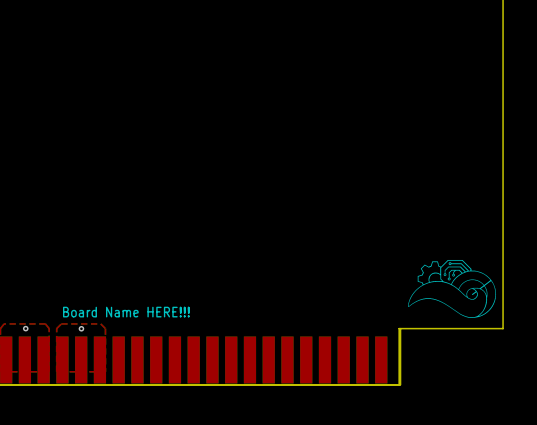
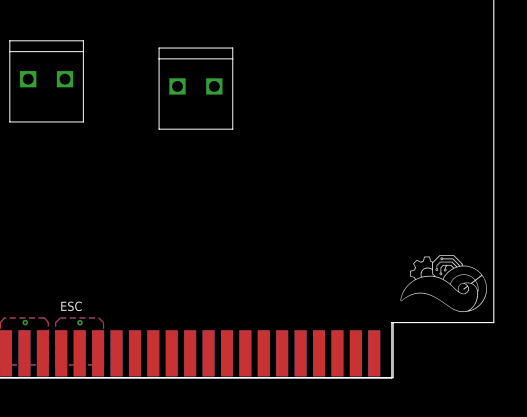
part: none -> (46, 81)
part: none -> (195, 88)
text: Board Name HERE!!! (126, 312) -> ESC (71, 306)

